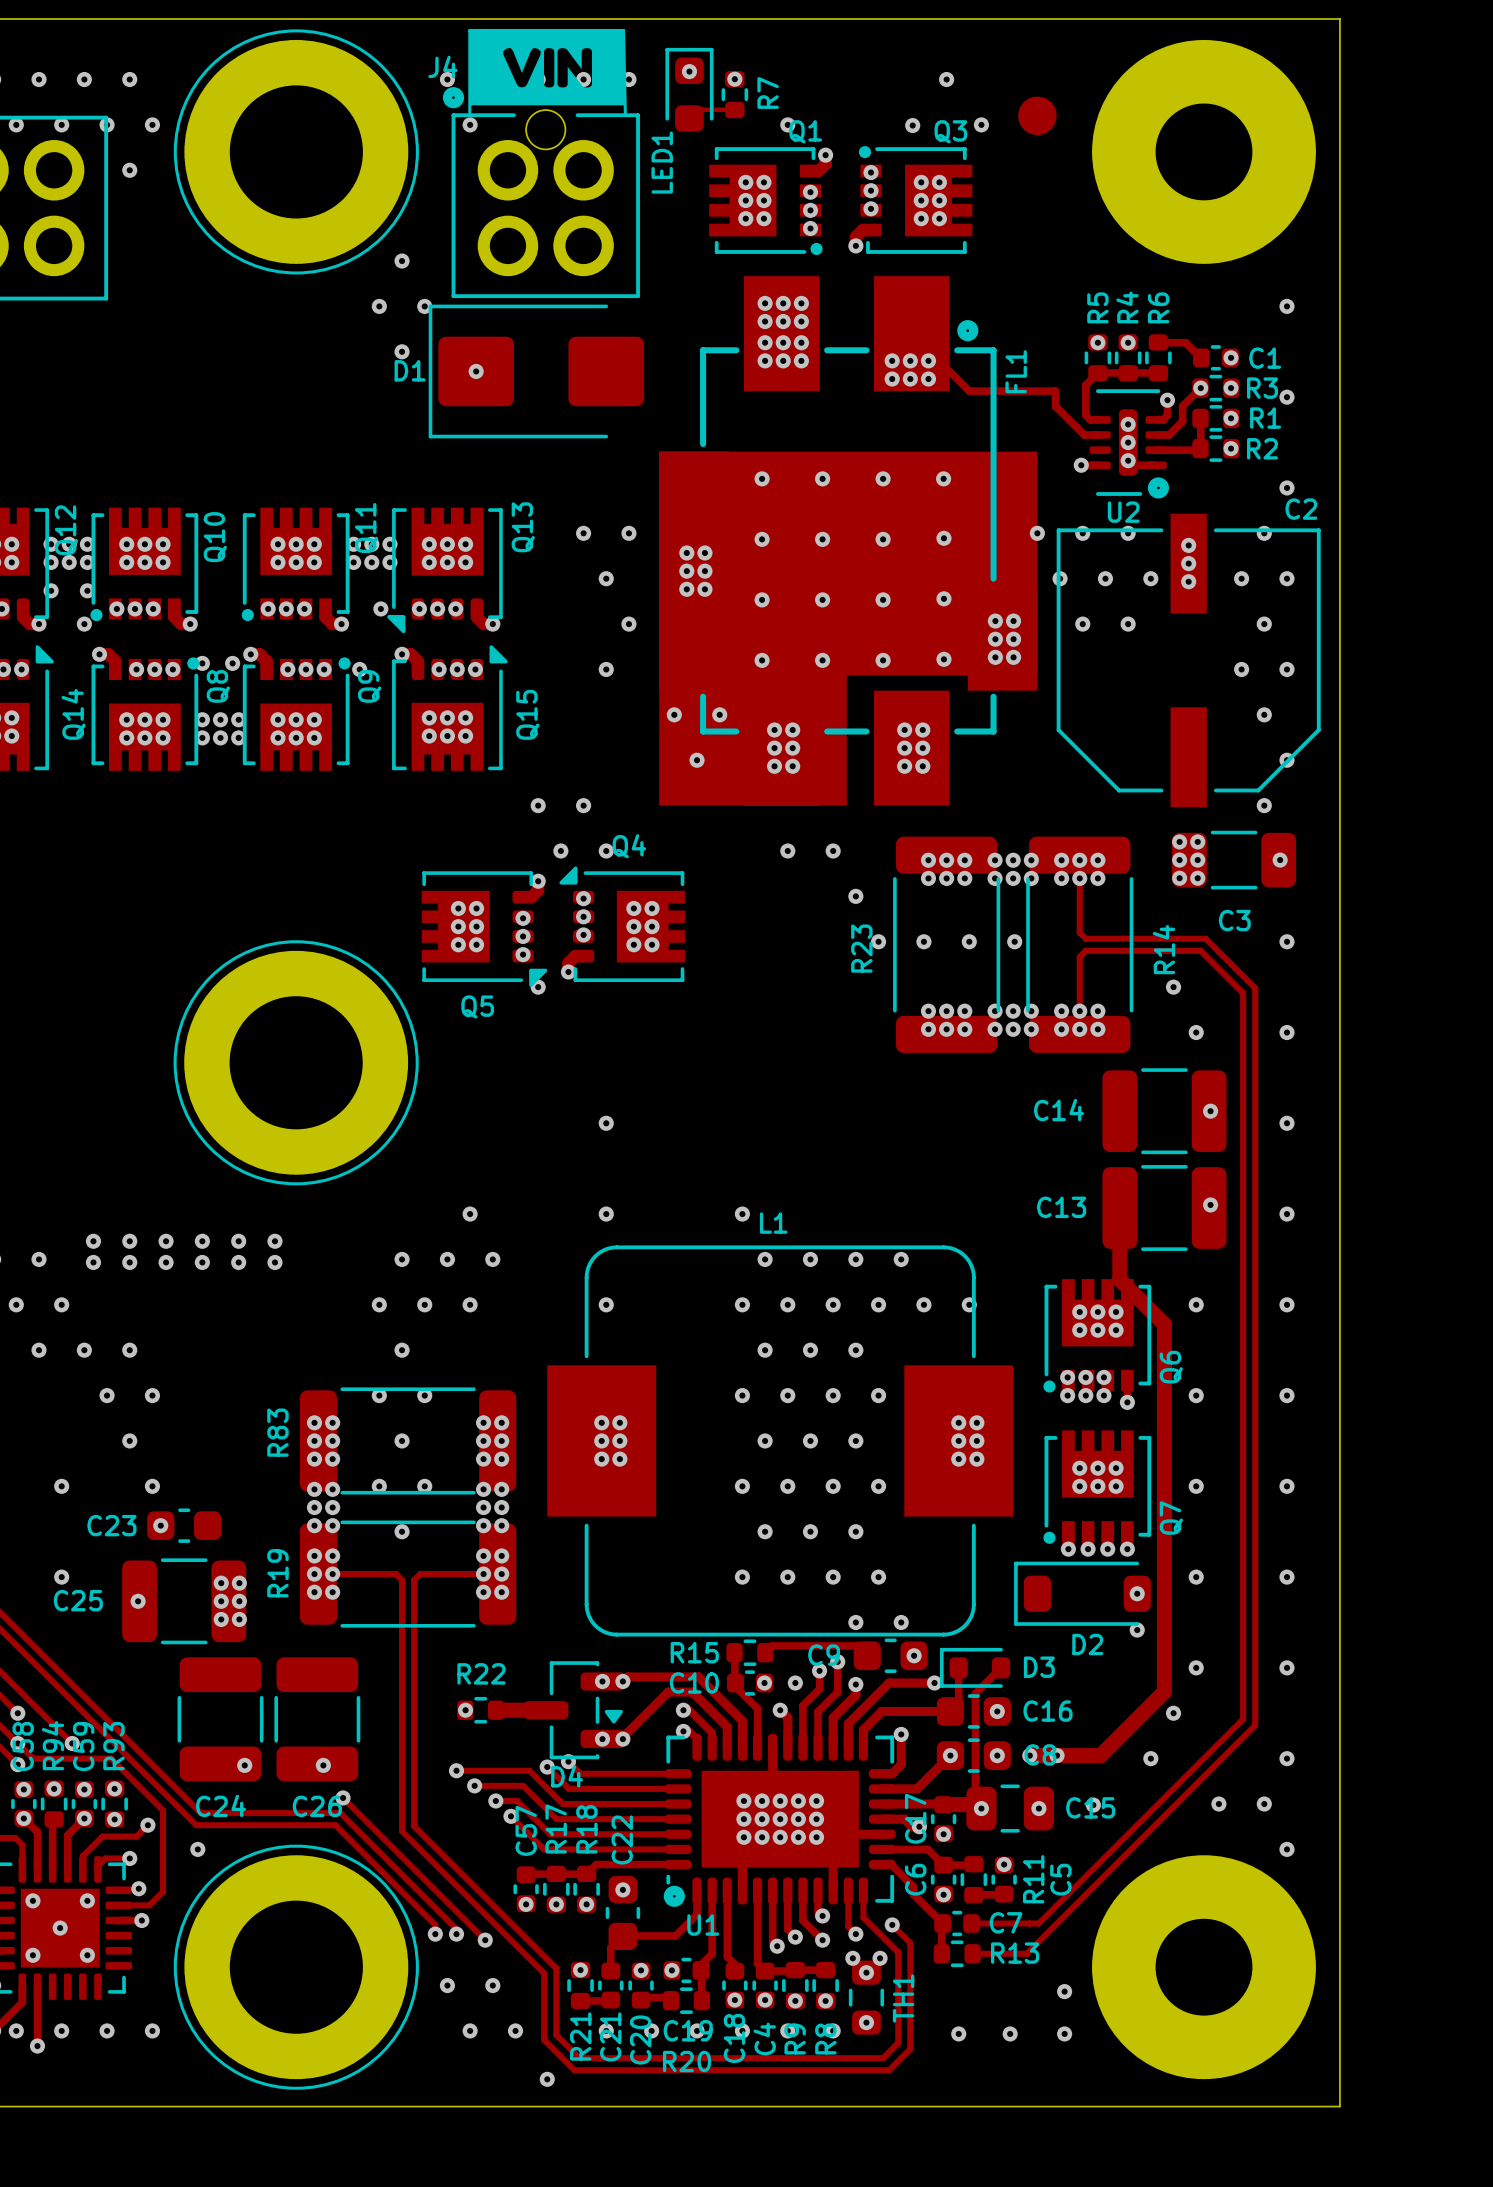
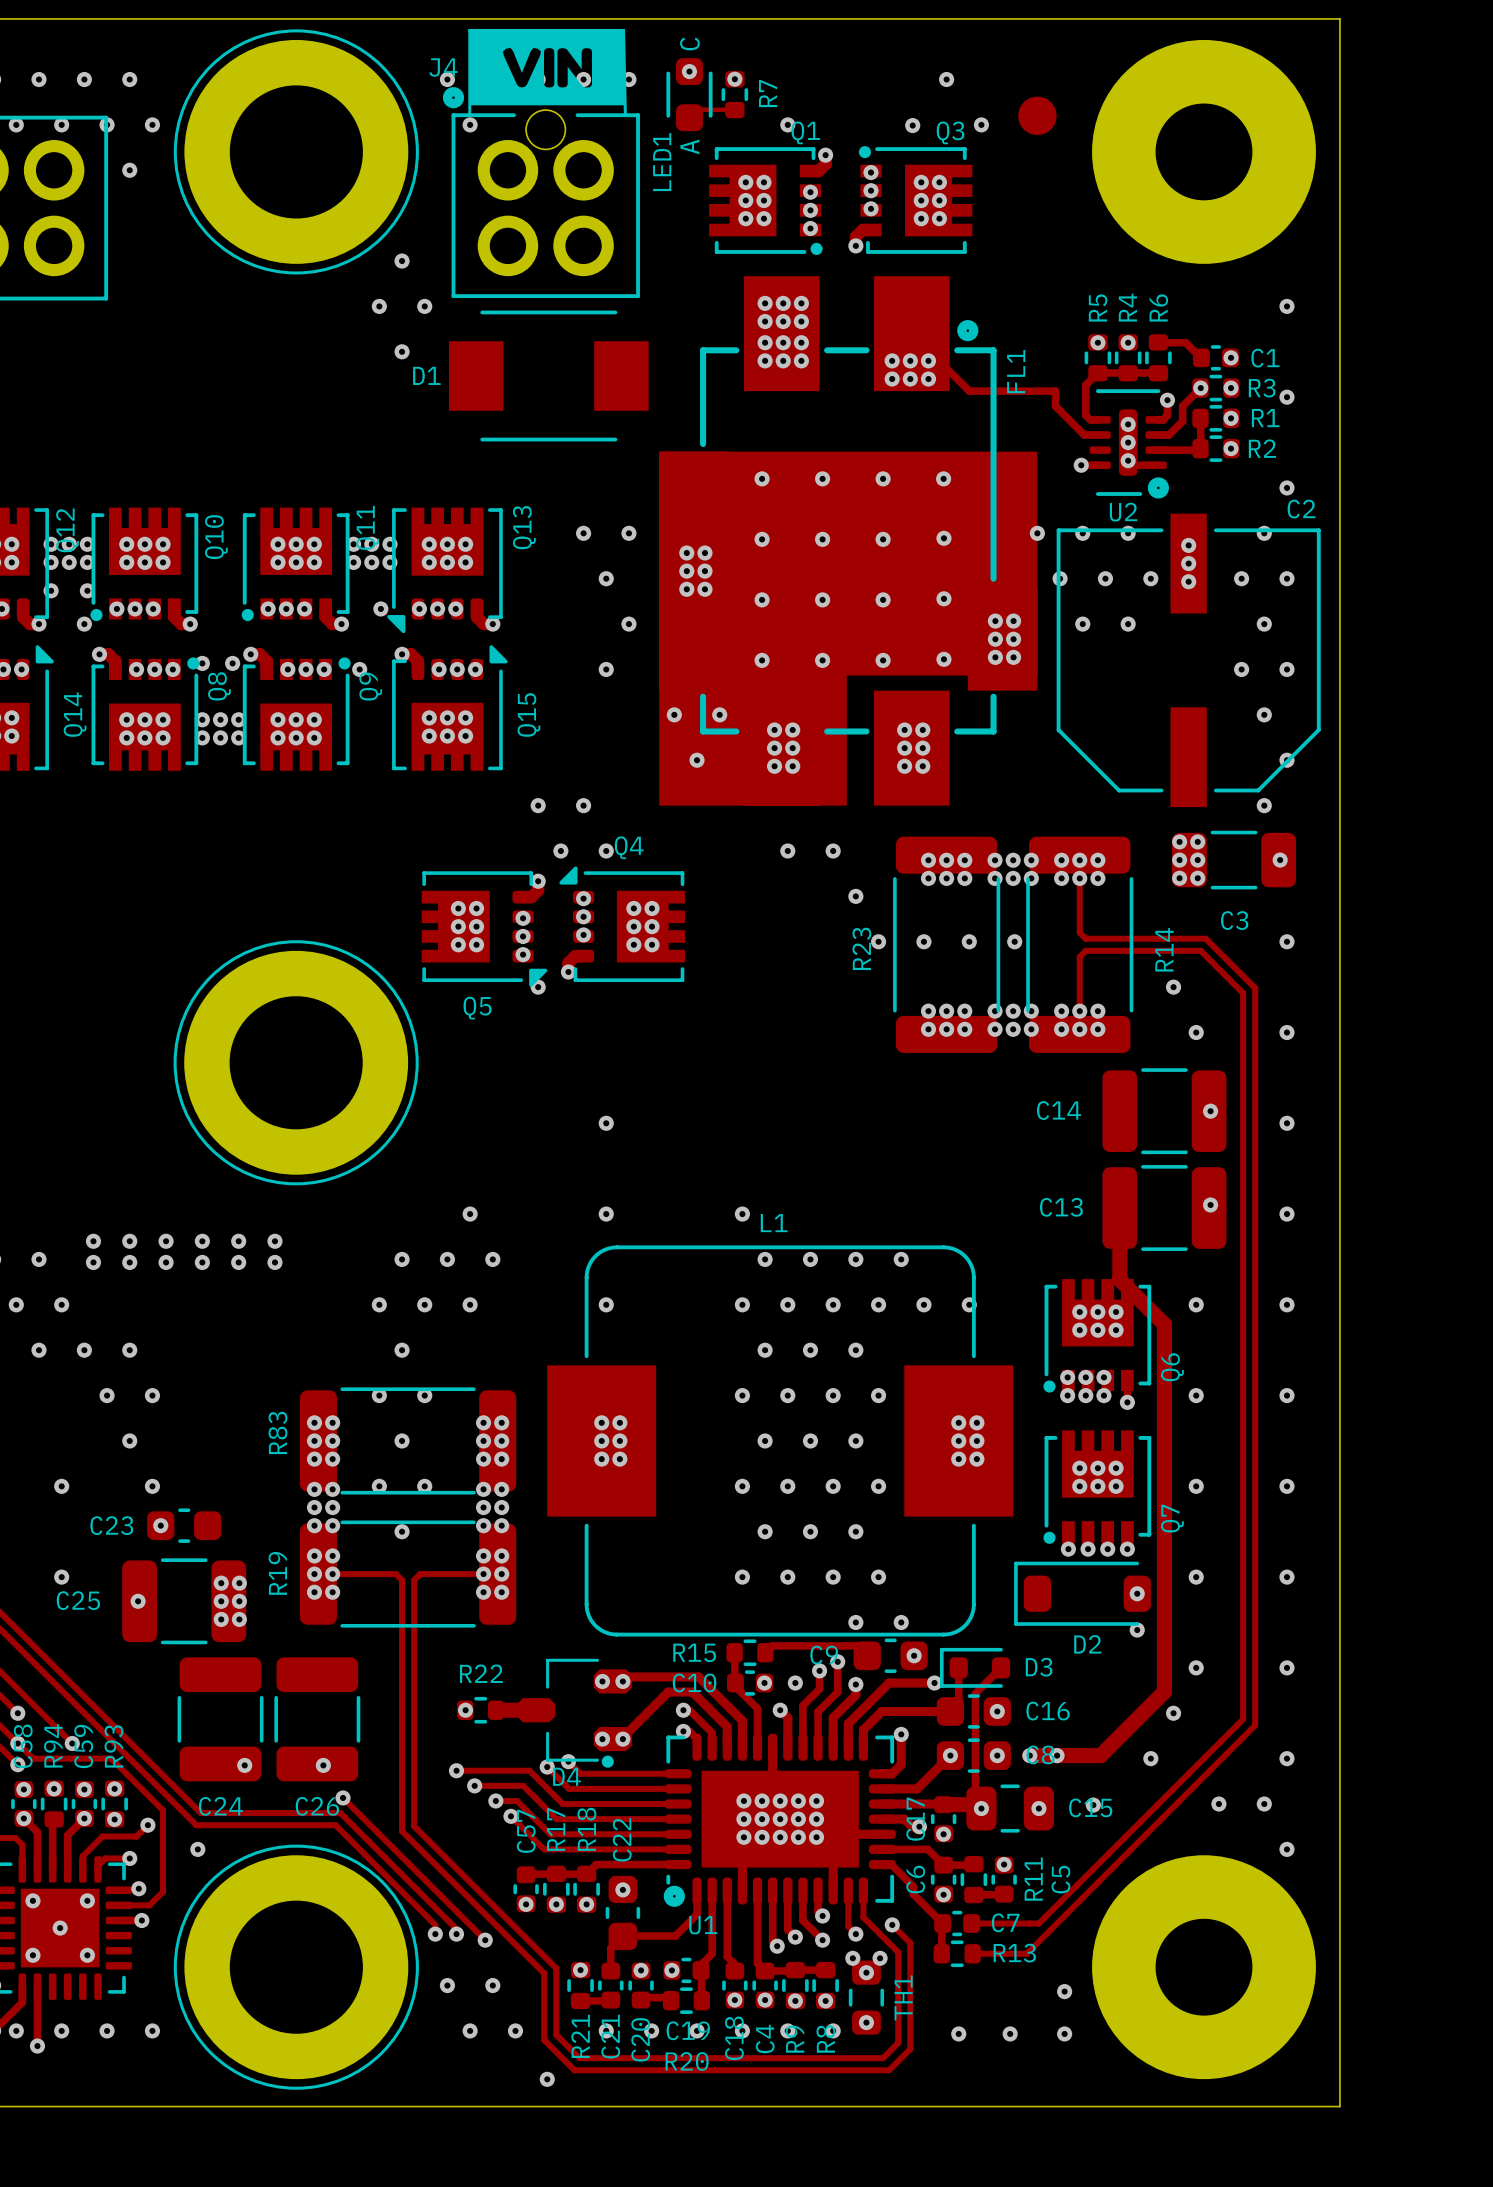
LED1 footprint: [665, 47, 714, 132] -> [666, 58, 713, 132]
D1 footprint: [428, 304, 645, 439] -> [448, 310, 649, 442]
via: (476, 371) -> none
D4 footprint: [523, 1661, 626, 1760] -> [516, 1658, 633, 1768]

